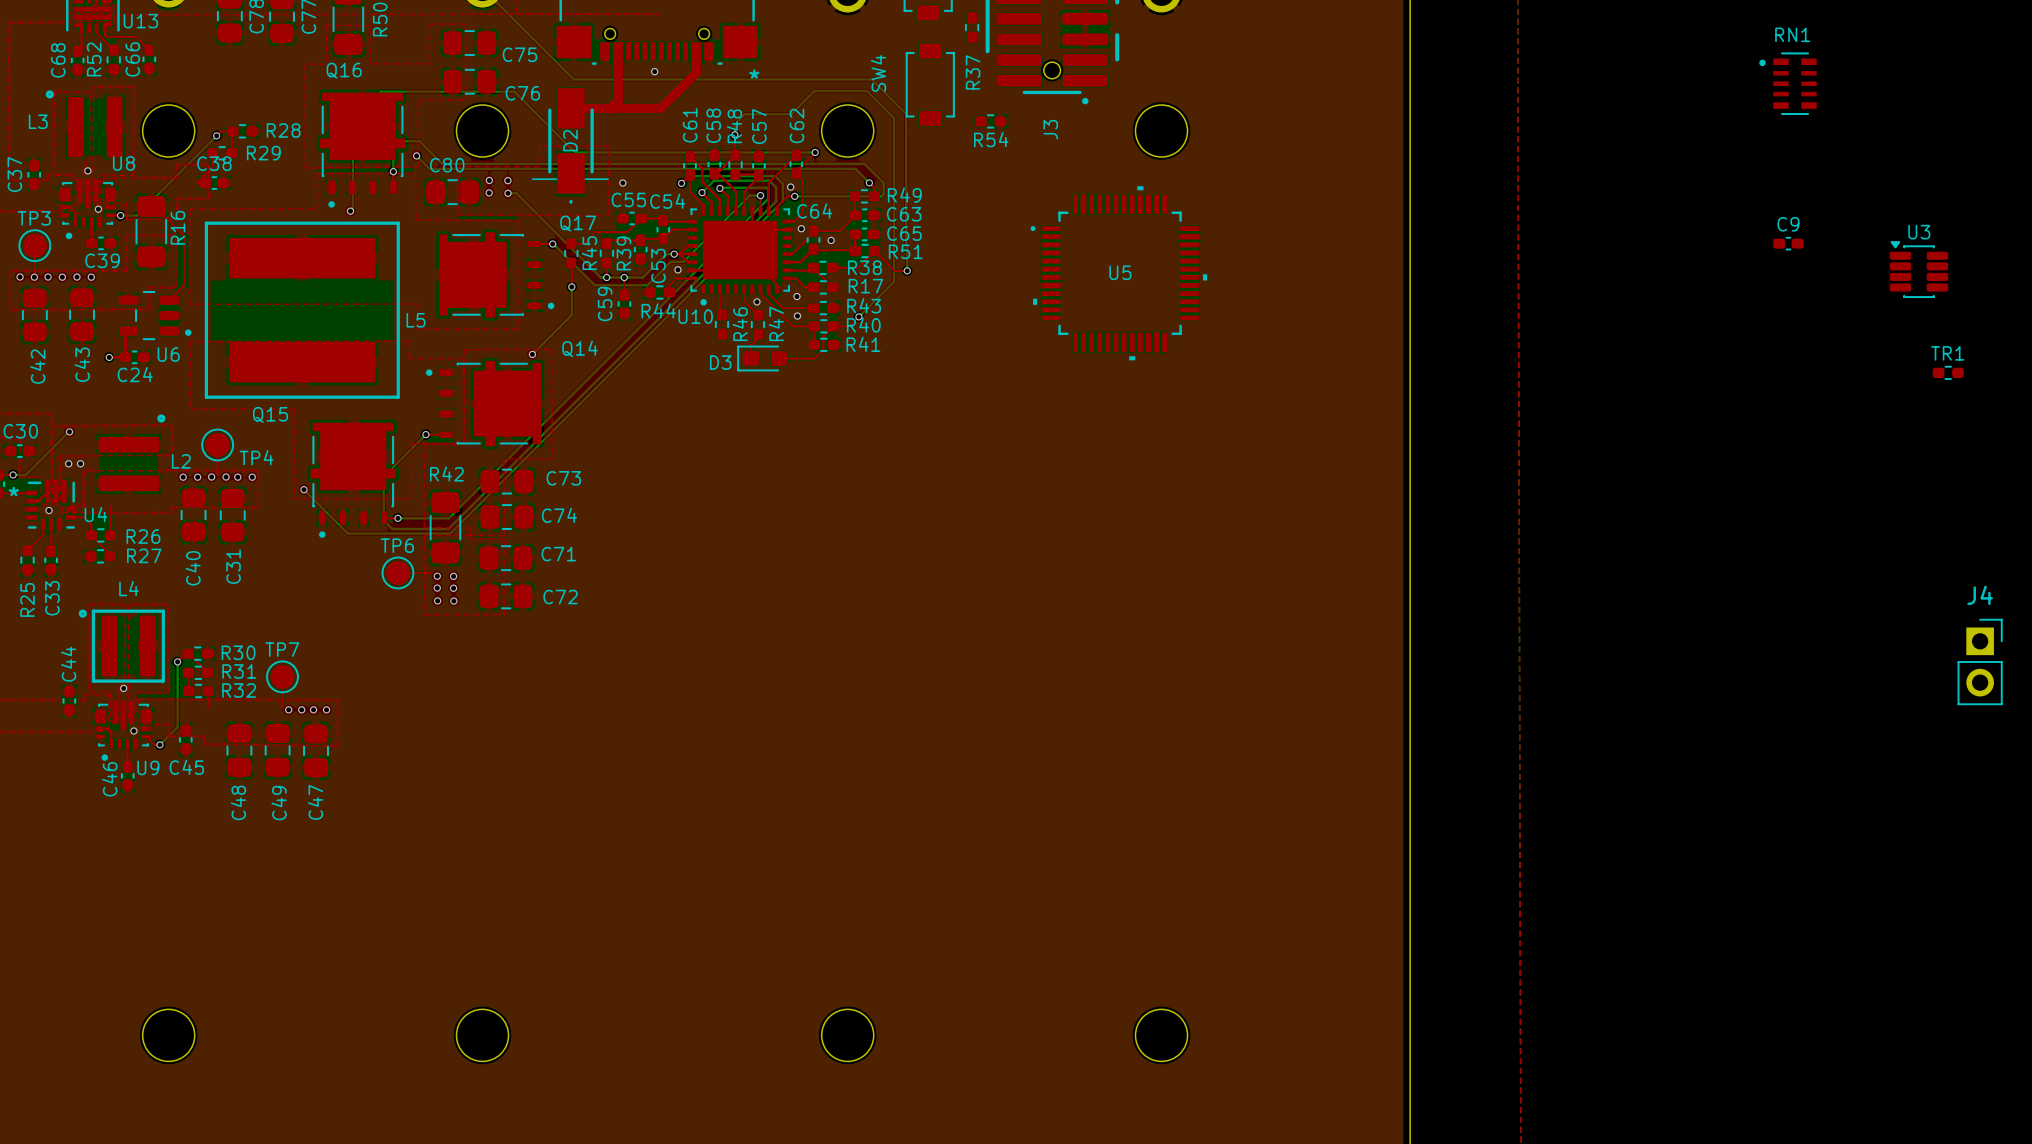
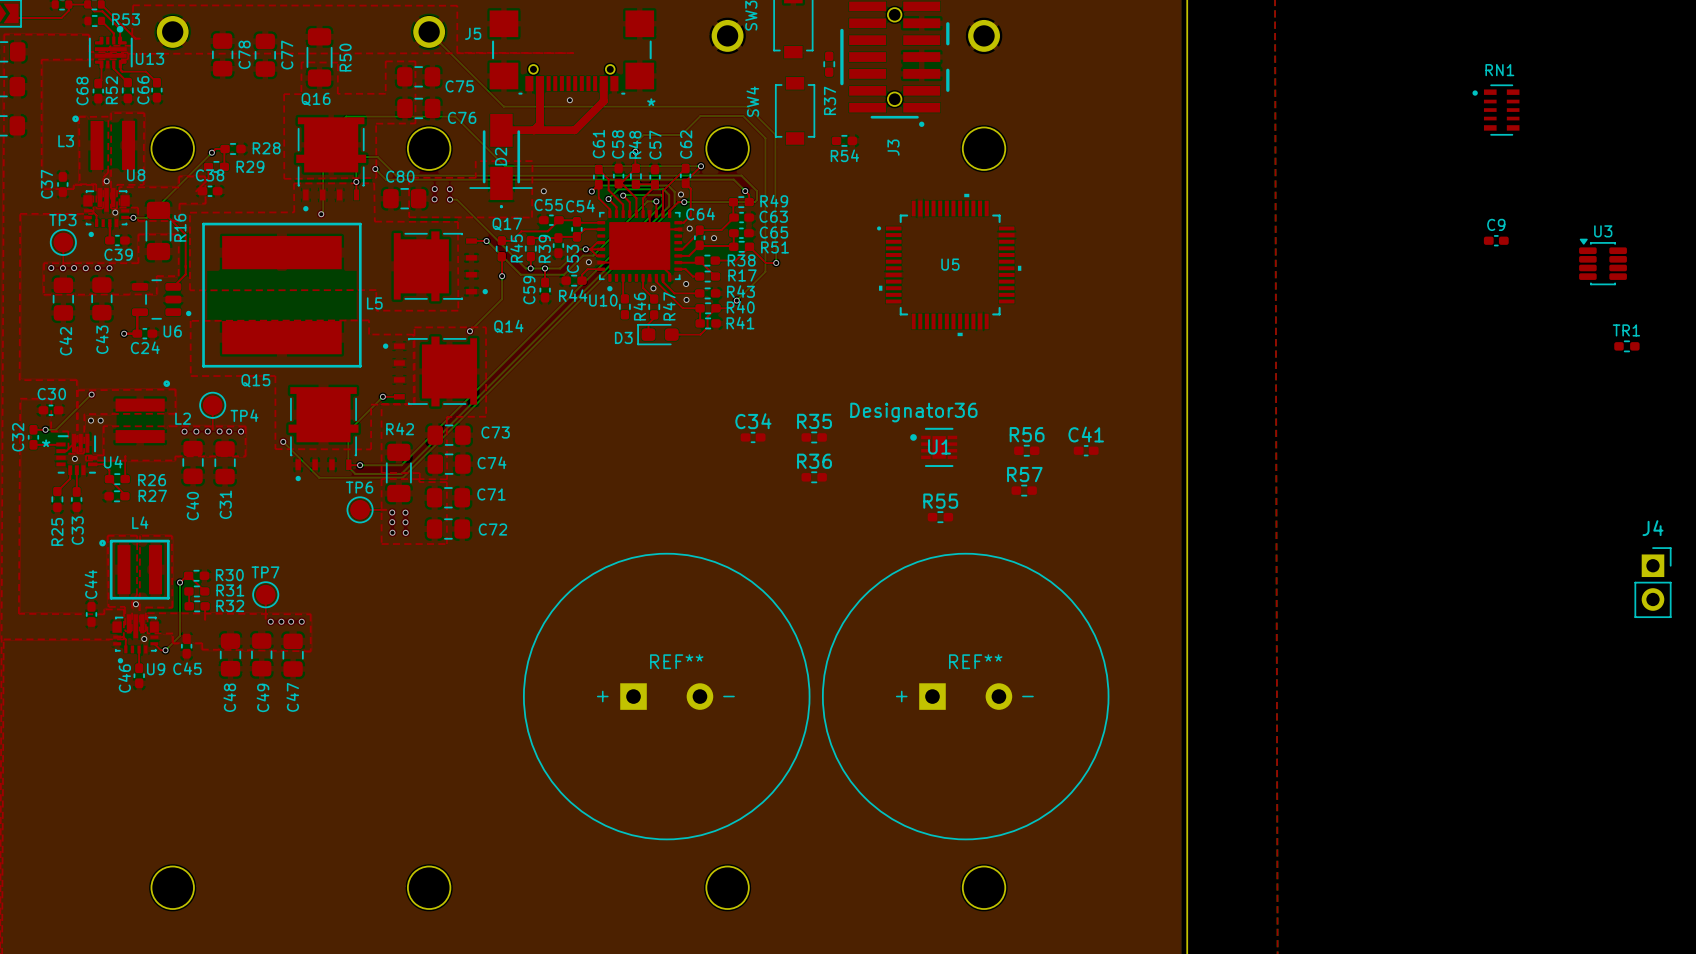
C34: none -> (753, 437)
R35: none -> (814, 437)
U1: none -> (933, 447)
R56: none -> (1026, 450)
C41: none -> (1086, 450)
R36: none -> (814, 477)
R57: none -> (1024, 490)
R55: none -> (940, 517)
part: none -> (666, 696)
part: none -> (965, 696)

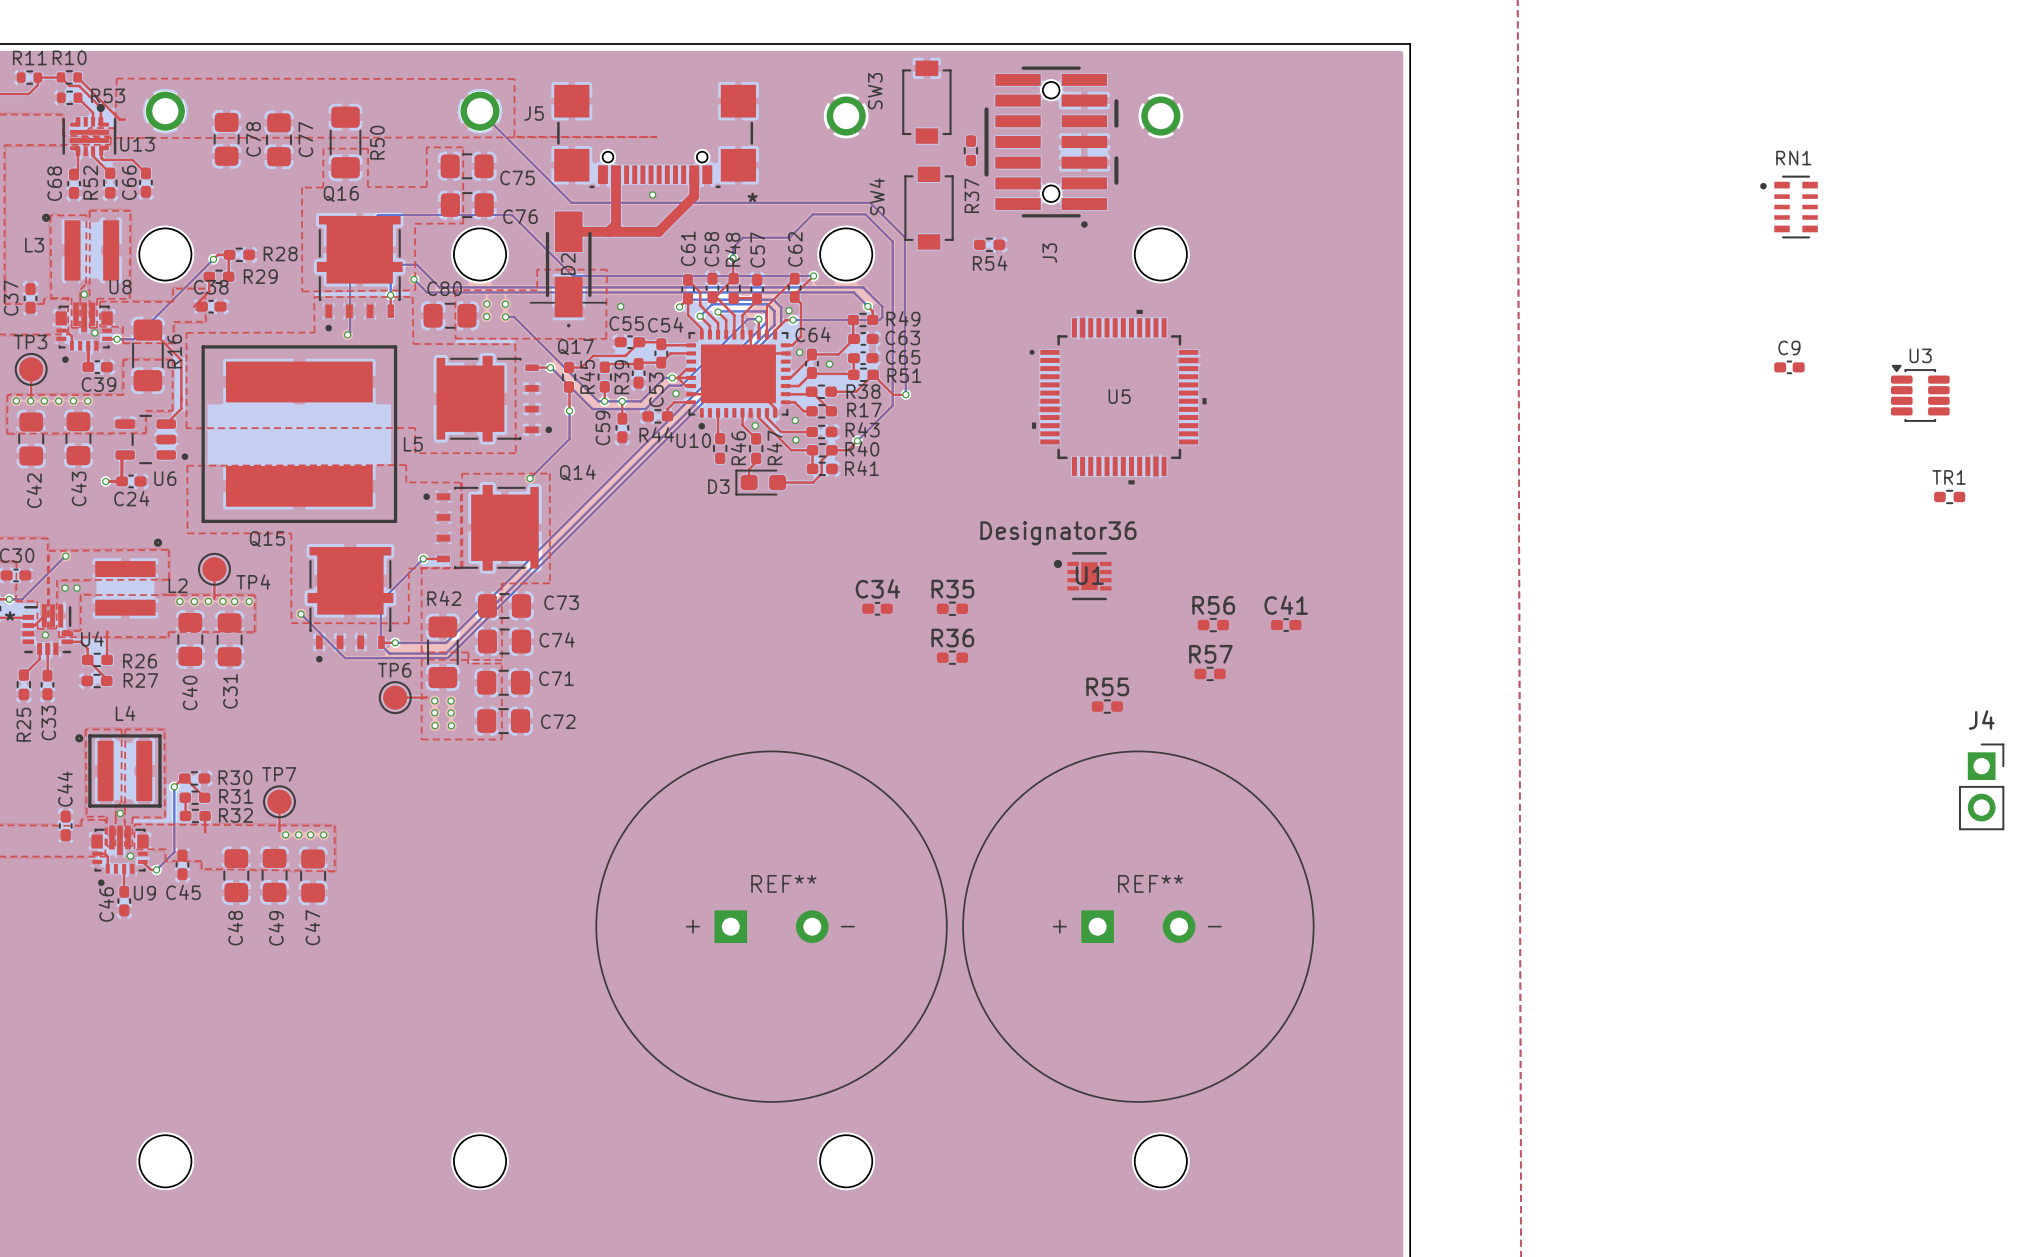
U1 position: (933, 447) -> (1082, 576)

